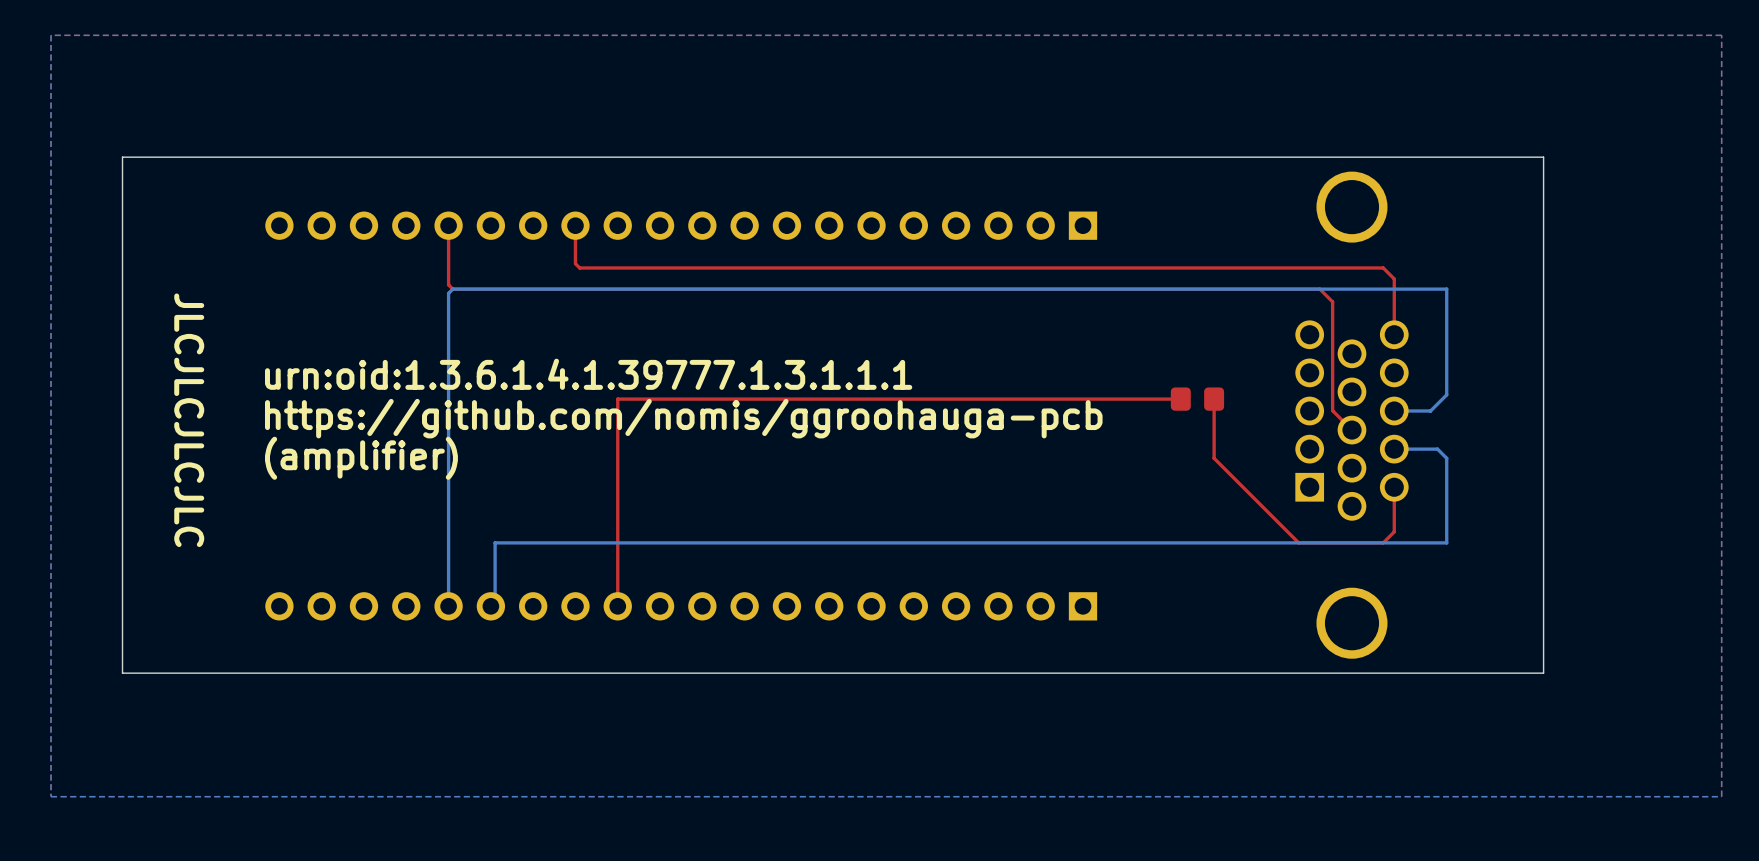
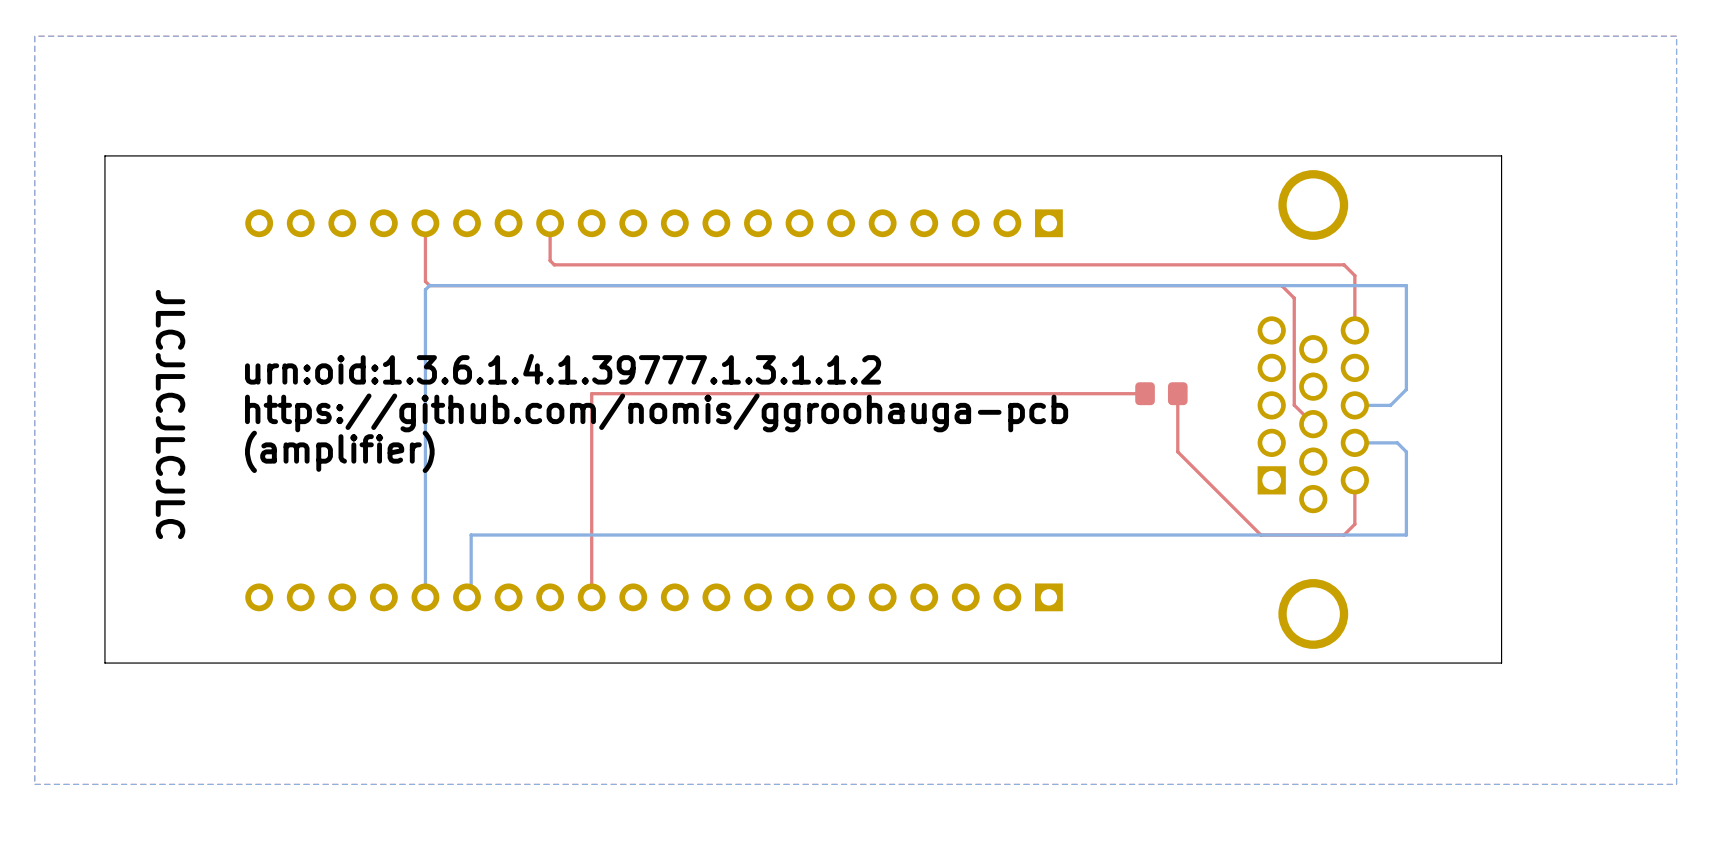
text: urn:oid:1.3.6.1.4.1.39777.1.3.1.1.1 (588, 374) -> urn:oid:1.3.6.1.4.1.39777.1.3.1.1.2 (563, 369)

